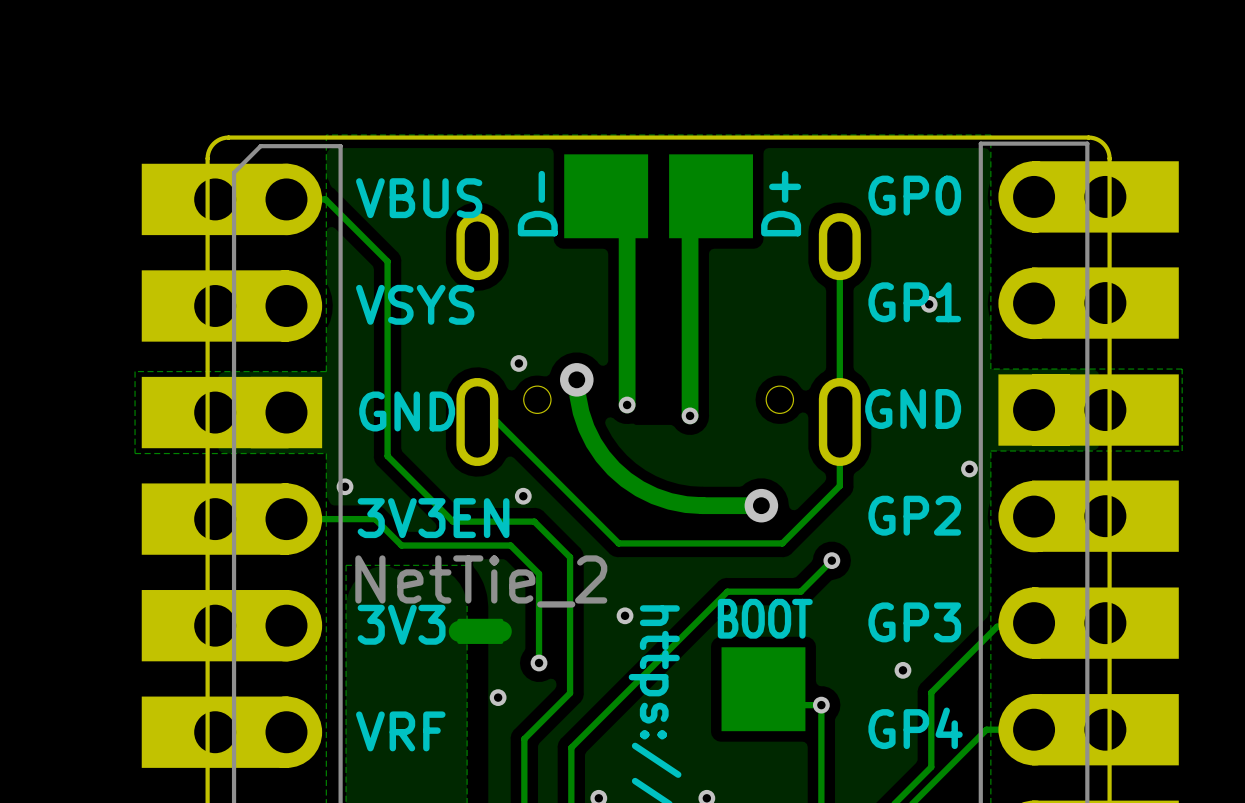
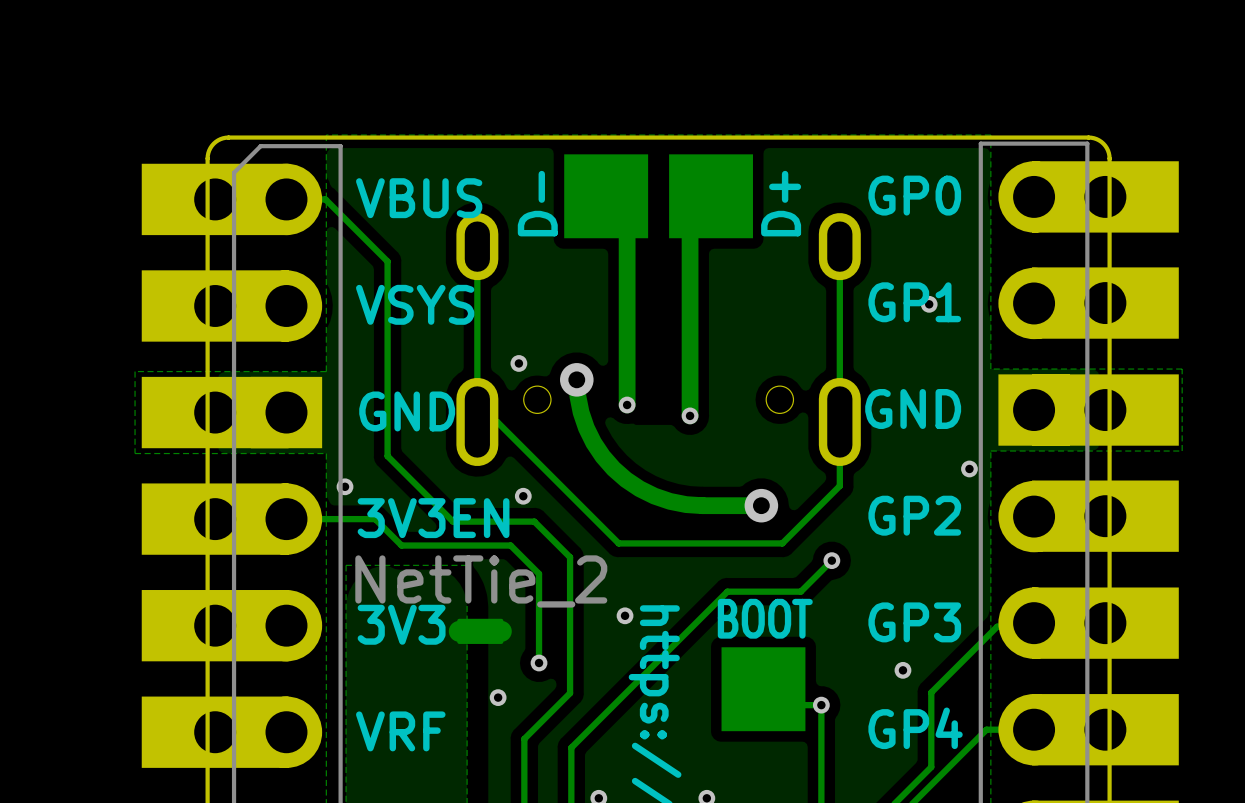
track: none -> (477, 246) (477, 421)

